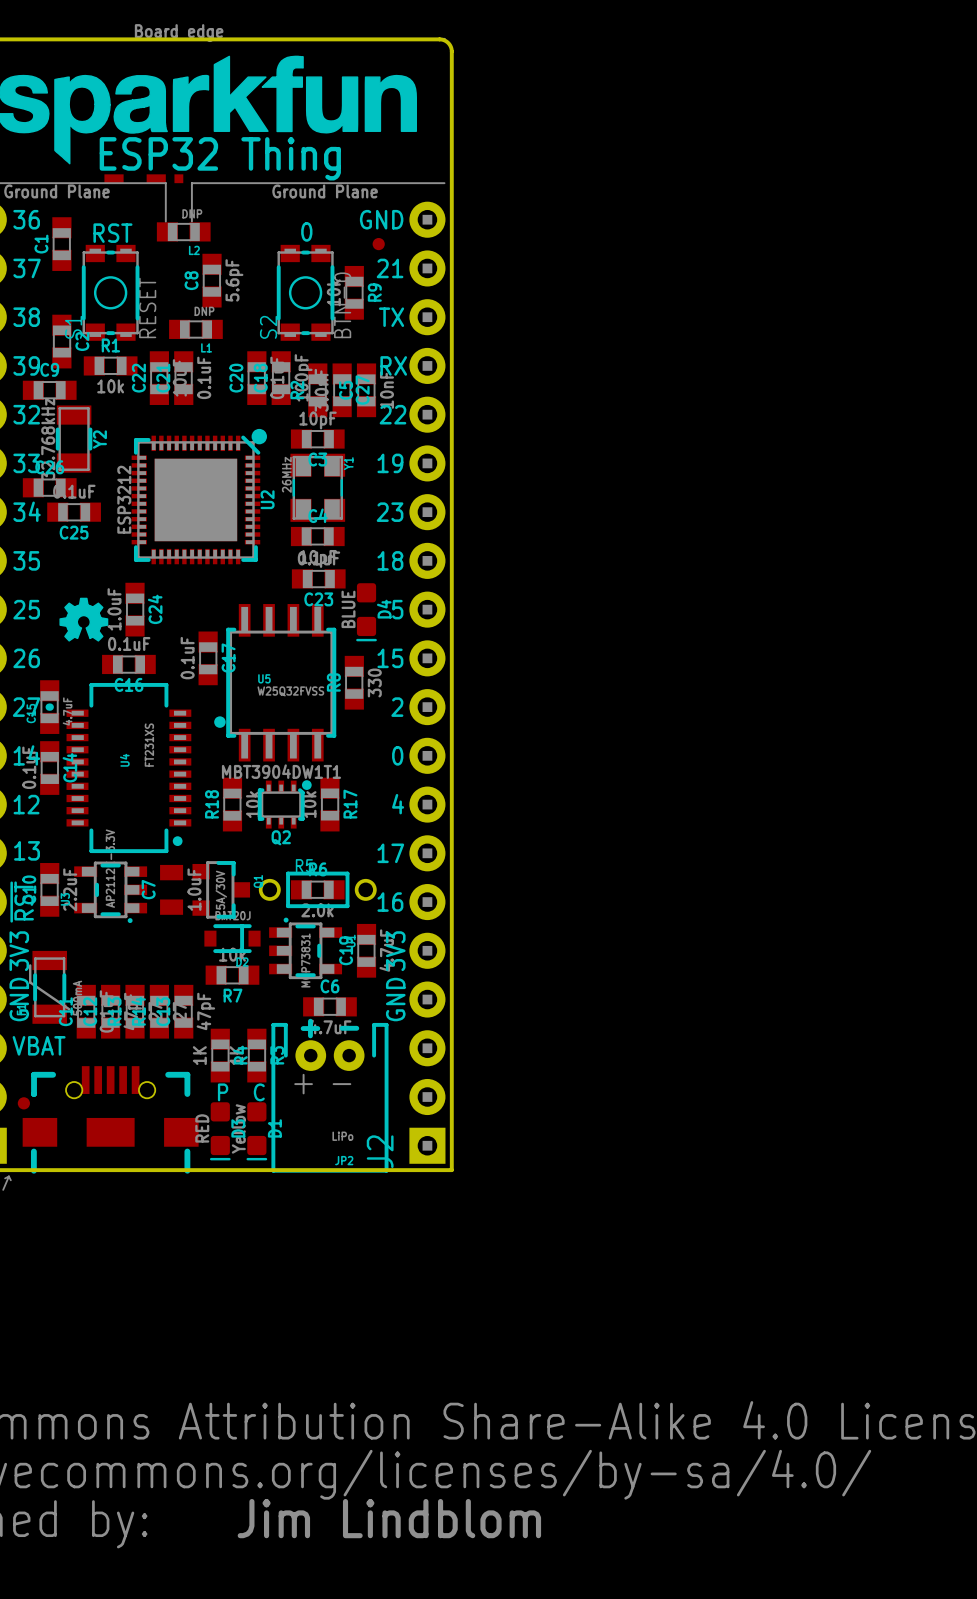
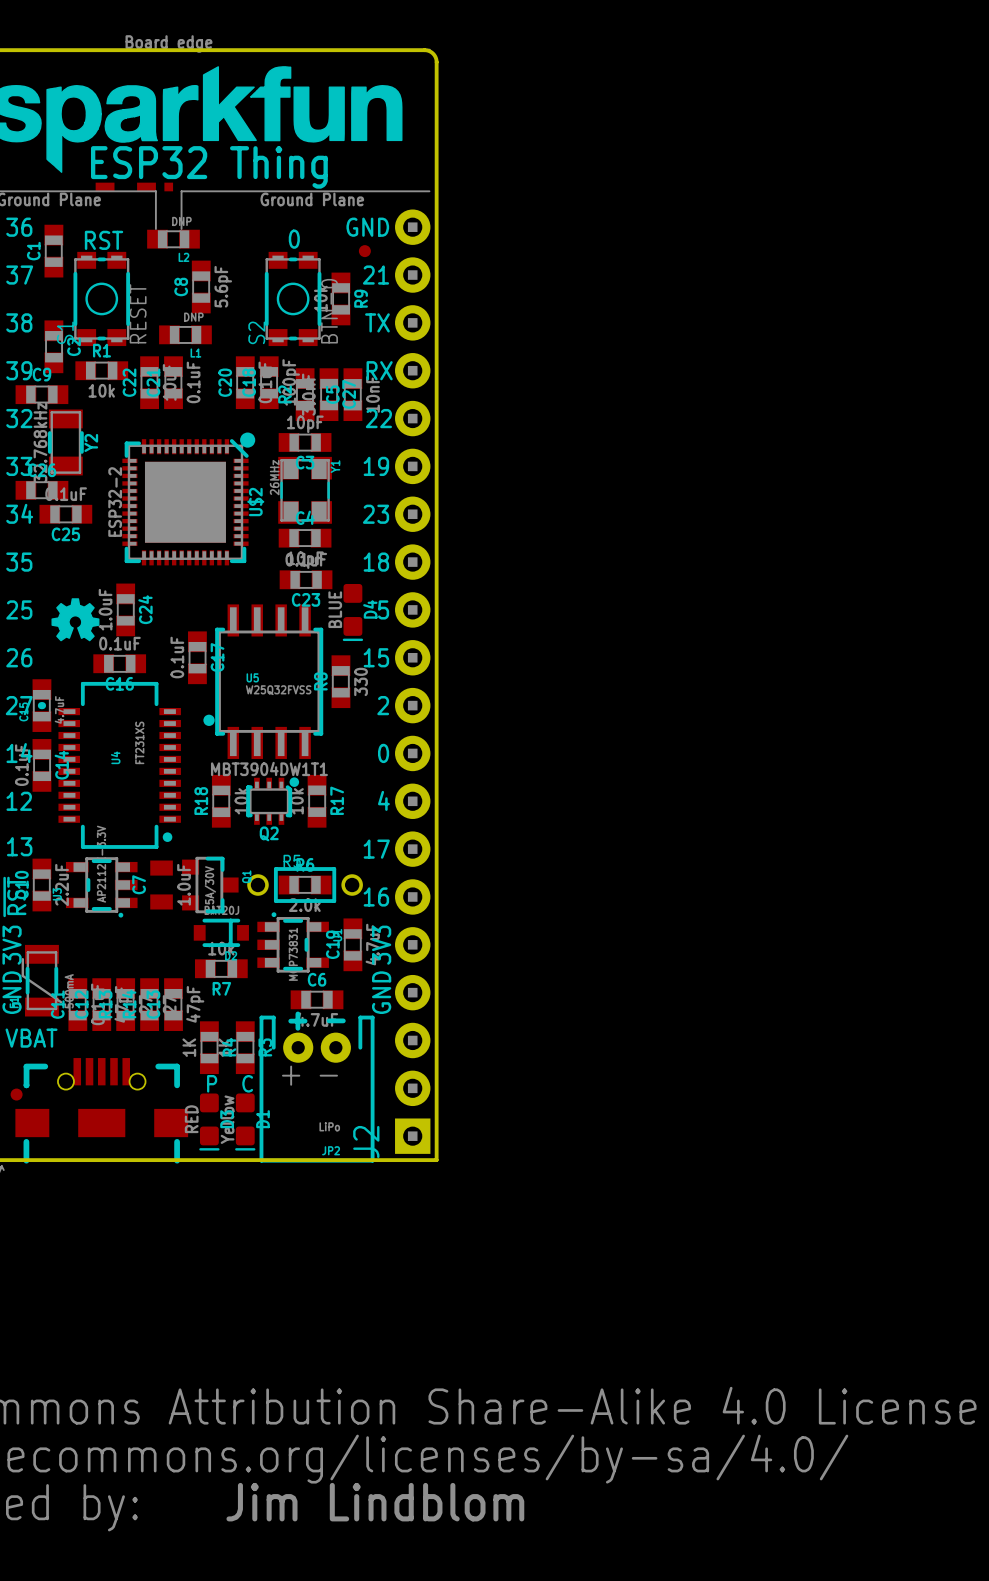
U2 value: ESP3212 (124, 499) -> ESP32-2 (115, 502)
U2 name: U2 (267, 499) -> U$2 (255, 502)

